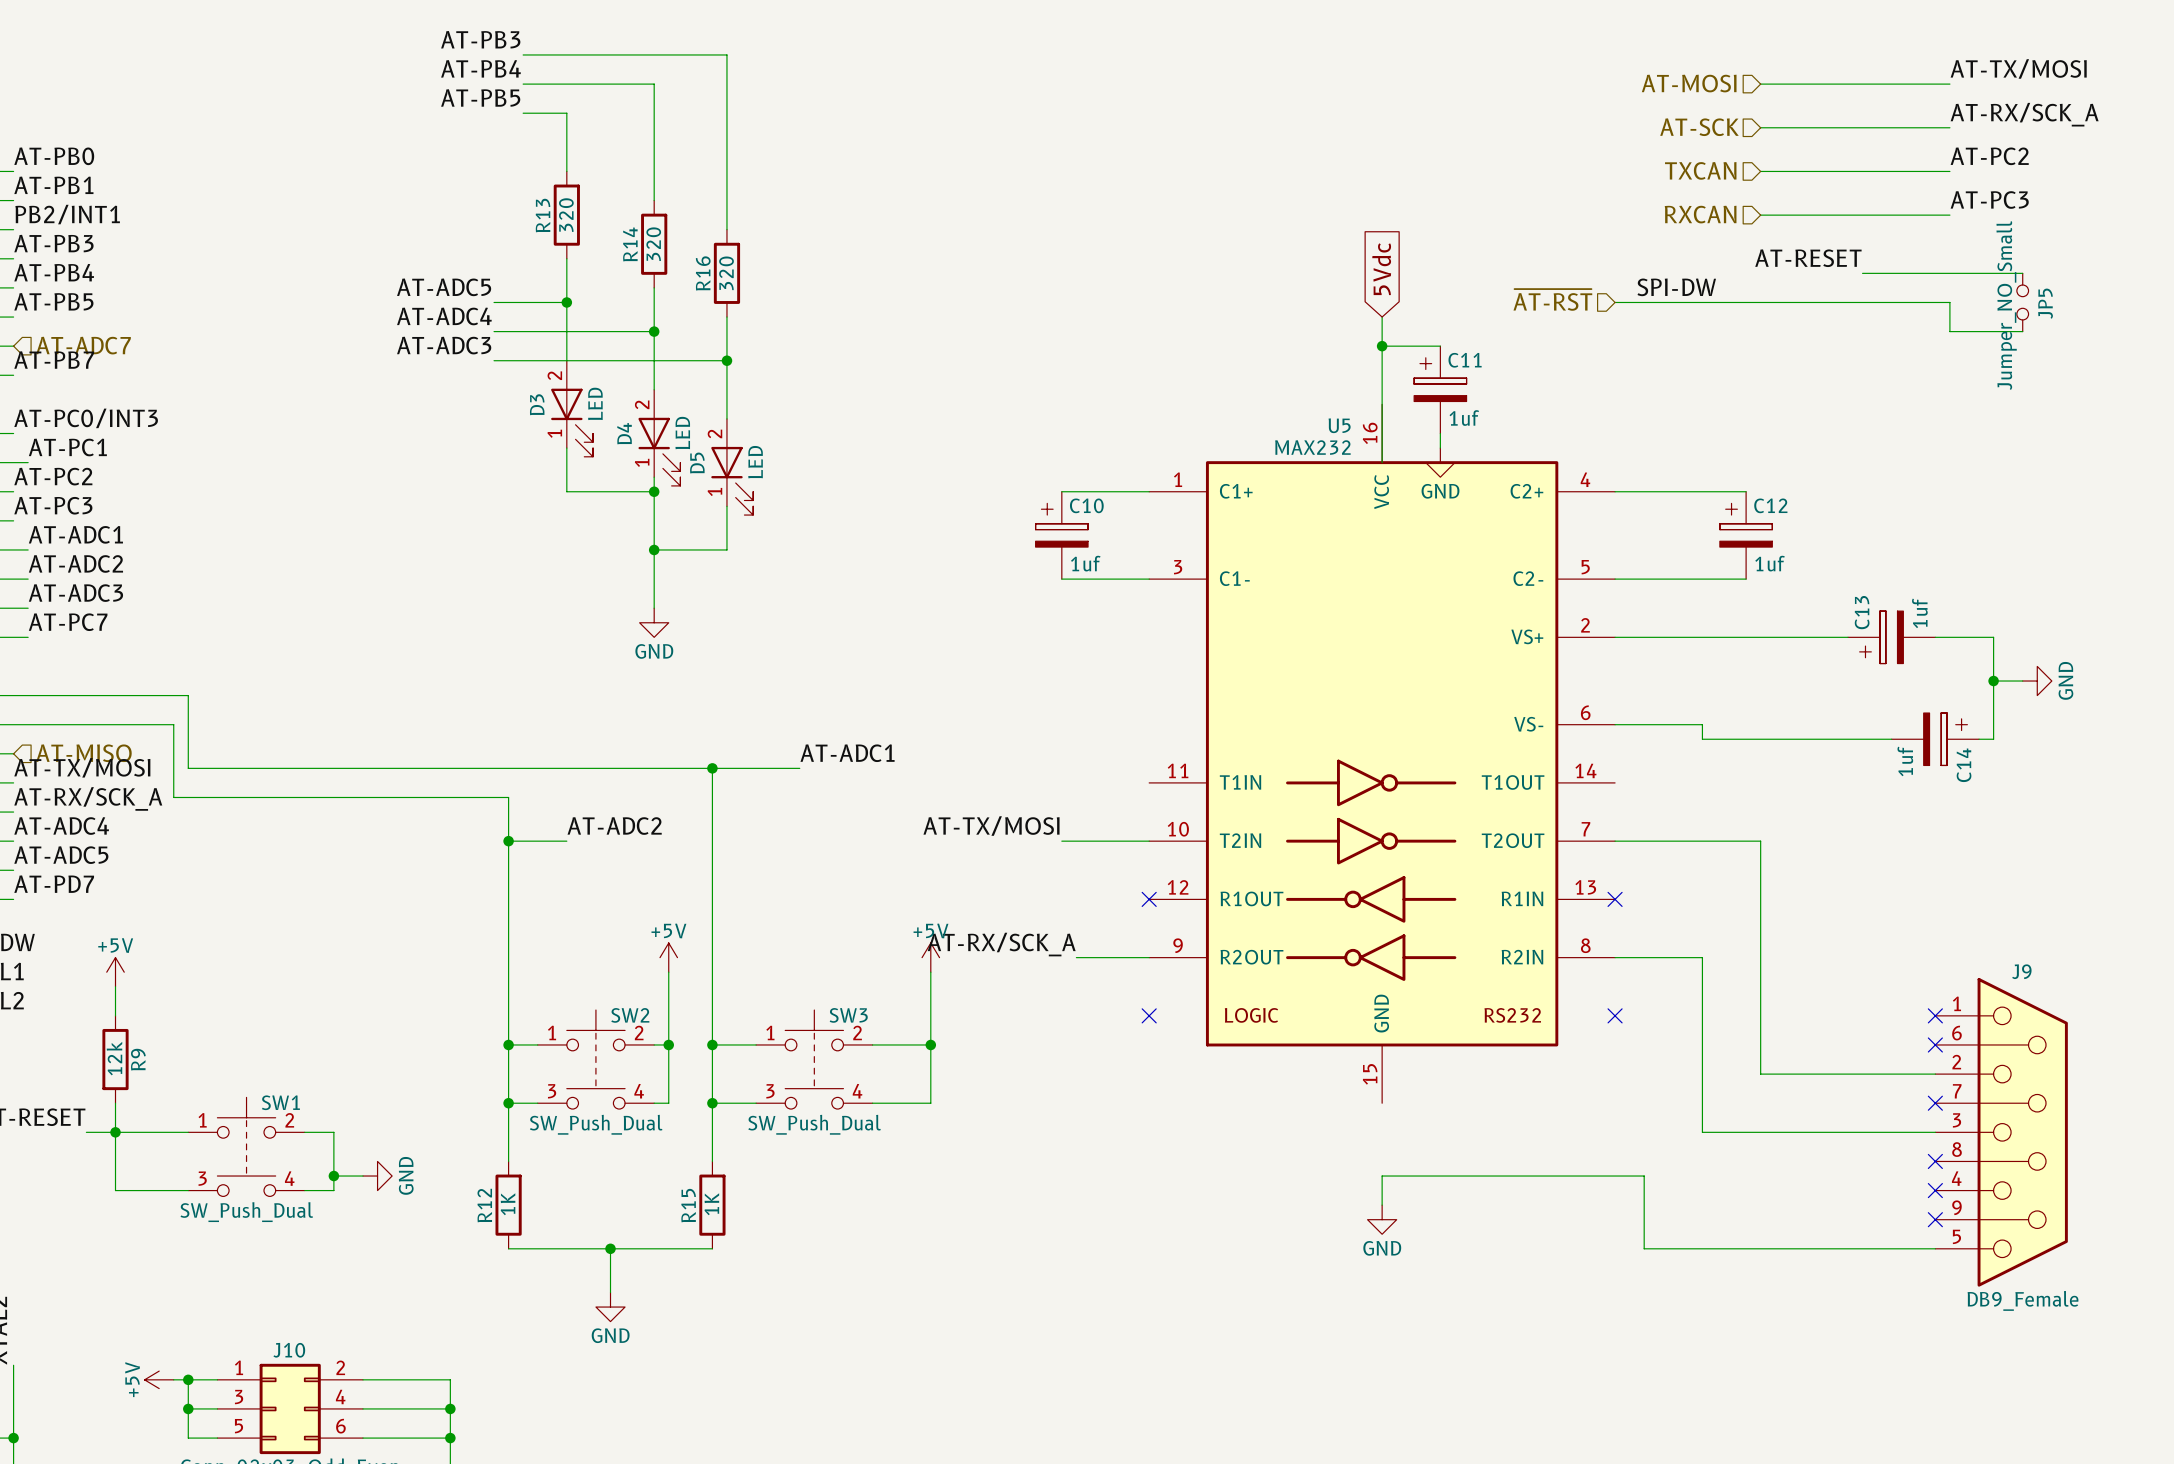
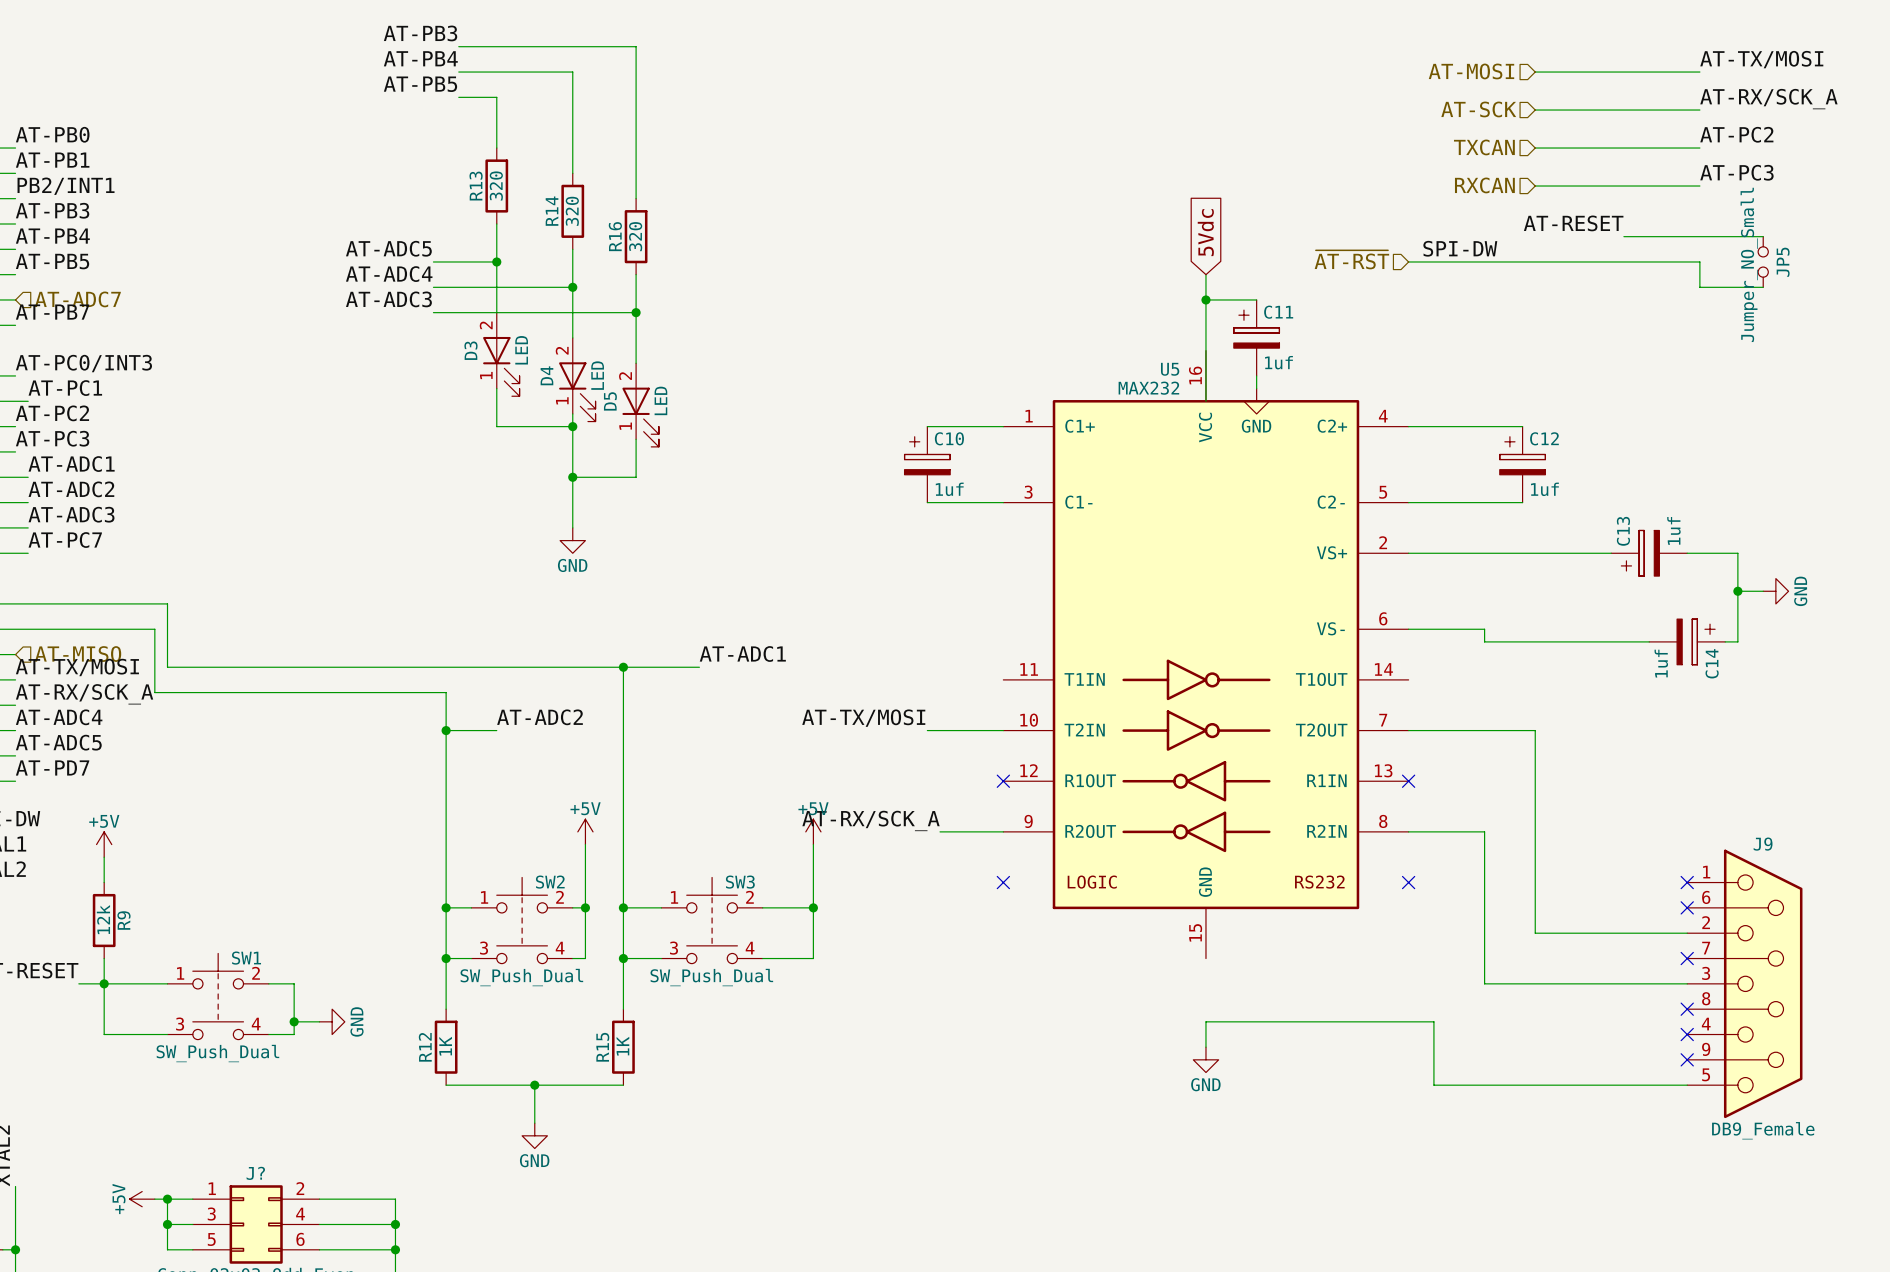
J10 name: J10 (289, 1350) -> J? (255, 1173)

